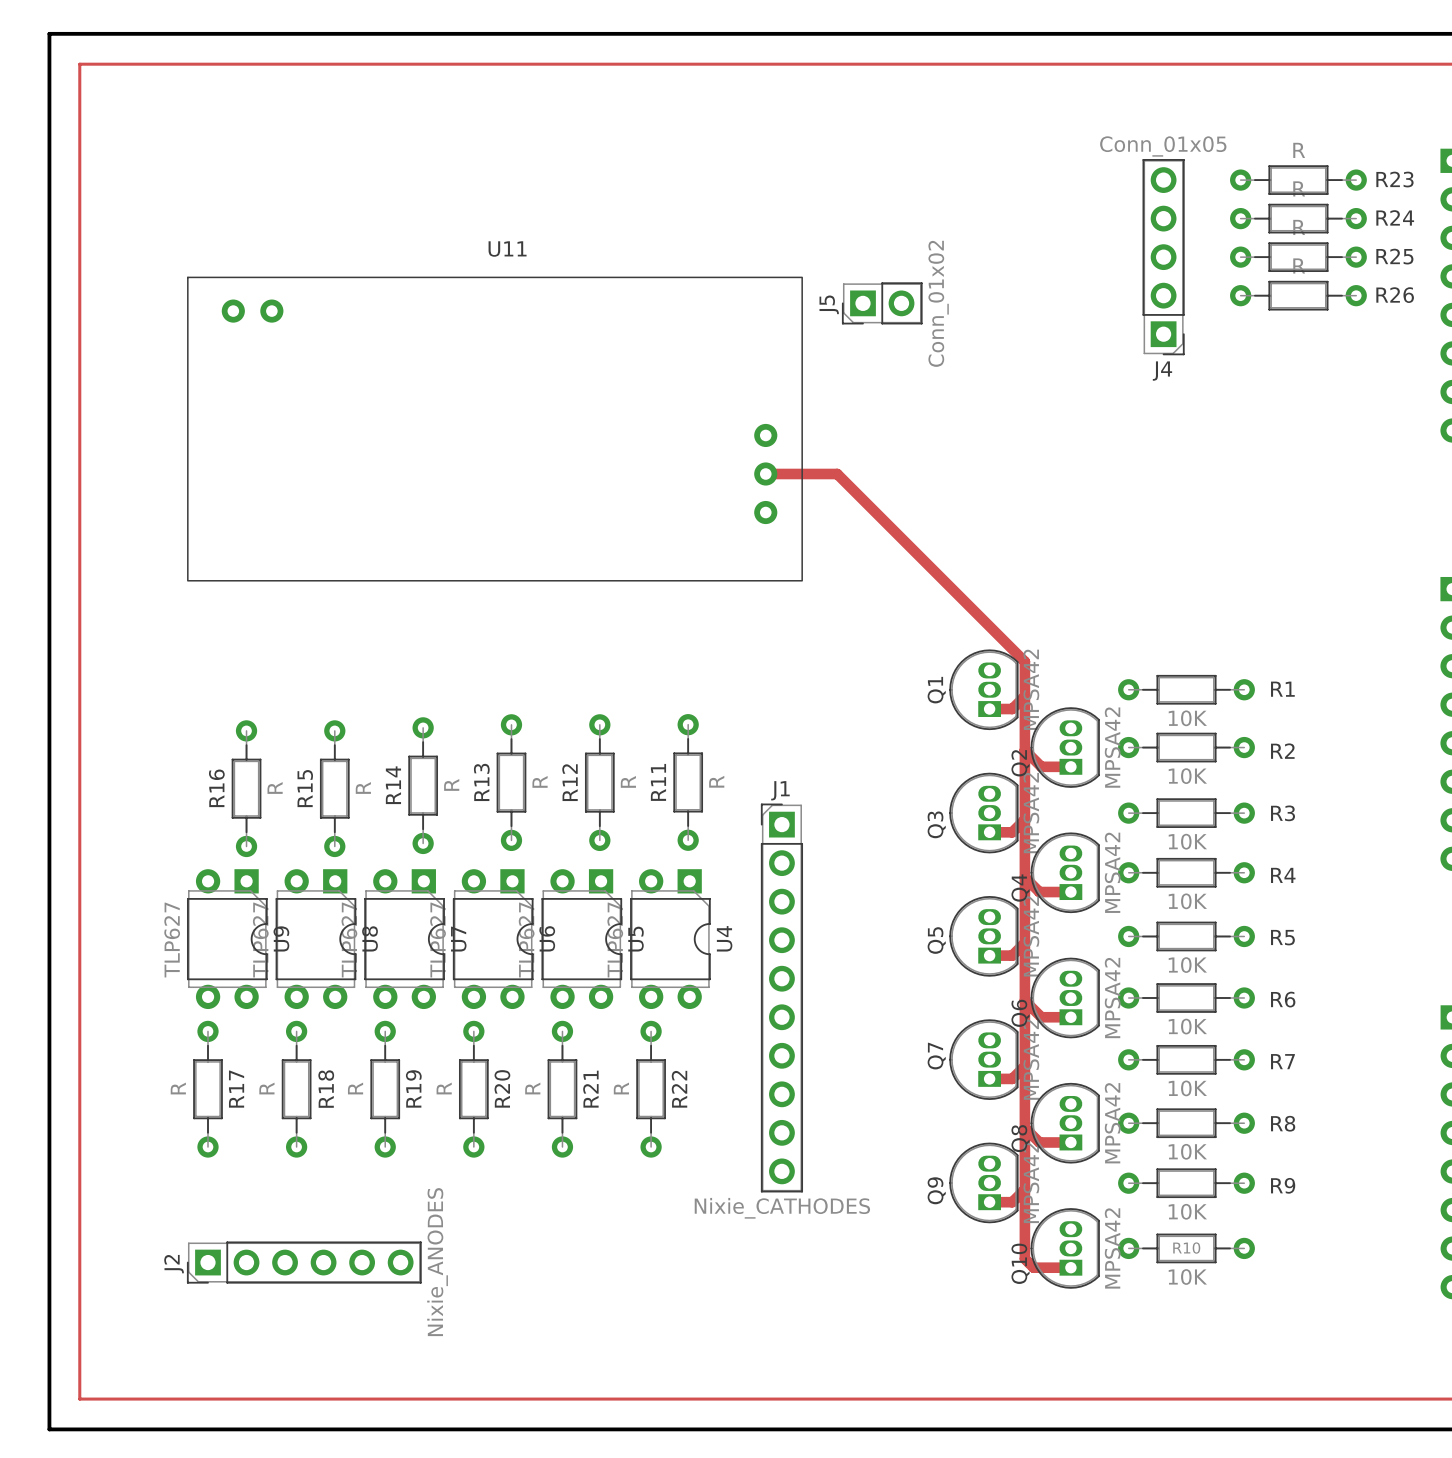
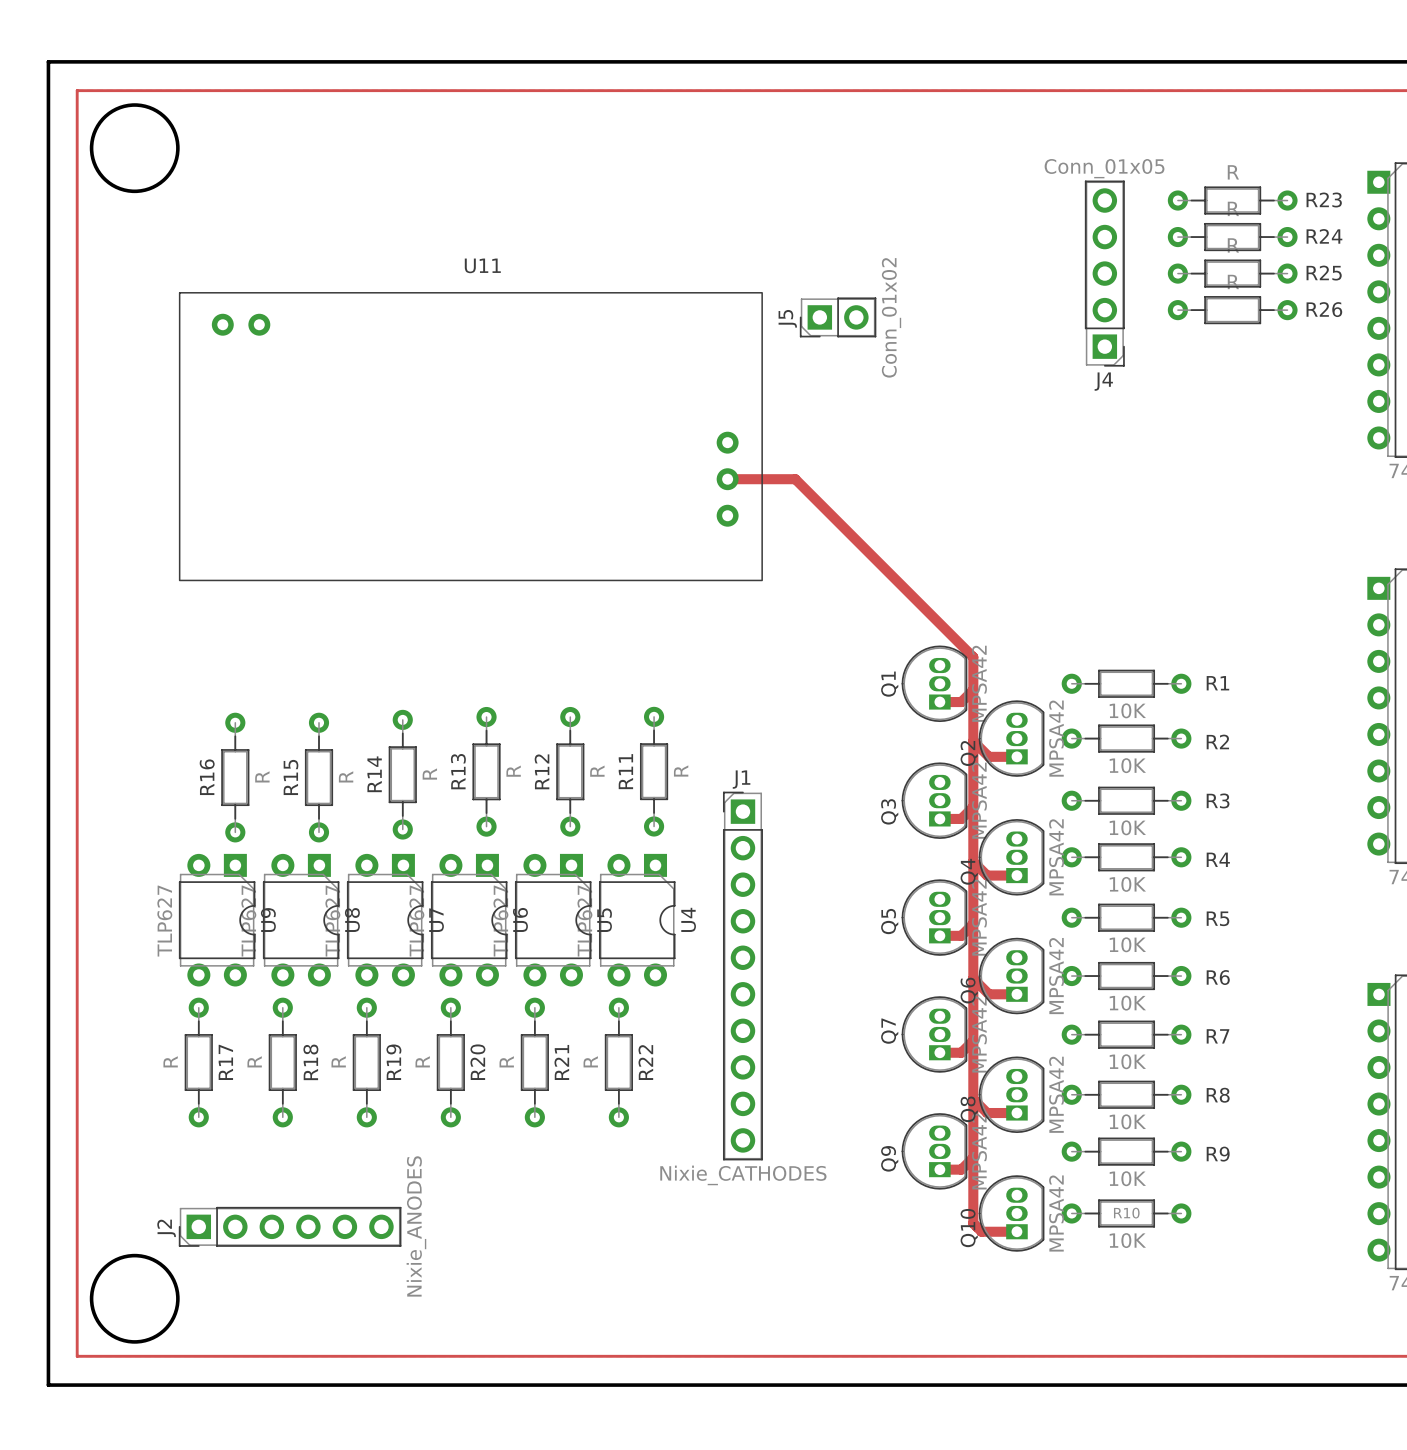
round board edge: none -> [89, 103, 180, 194]
round board edge: none -> [89, 1253, 180, 1344]

